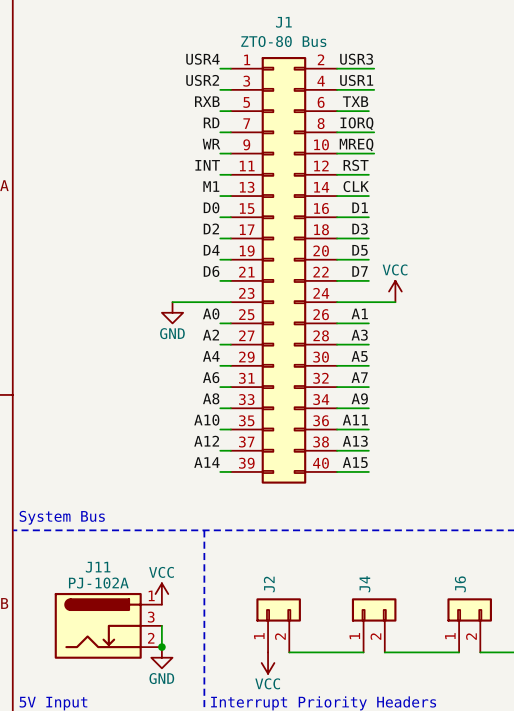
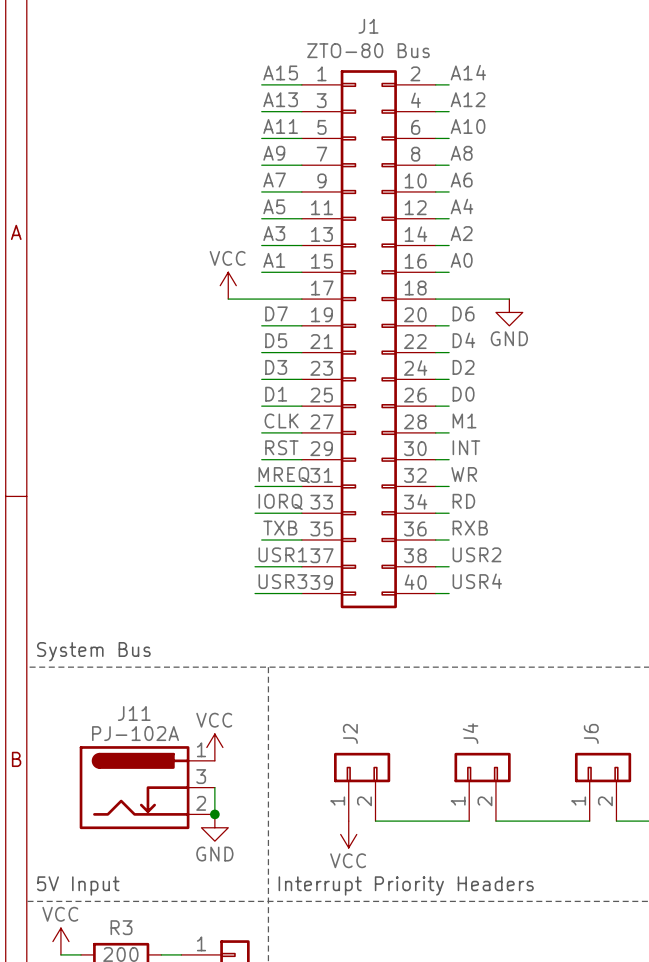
label: USR4 (202, 59) -> none
label: none -> A15 (280, 72)
label: USR3 (356, 59) -> none
label: none -> A14 (468, 72)
wire: (347, 68) (374, 68) -> none
label: USR2 (202, 80) -> none
label: none -> A13 (280, 99)
label: USR1 (356, 80) -> none
label: none -> A12 (468, 99)
wire: (347, 89) (374, 89) -> none
label: RXB (207, 101) -> none
label: none -> A11 (280, 126)
label: TXB (355, 101) -> none
label: none -> A10 (468, 126)
wire: (347, 111) (368, 111) -> (261, 165) (288, 165)
label: none -> A9 (274, 153)
label: RD (211, 122) -> none
label: none -> A8 (461, 153)
label: IORQ (356, 123) -> none
wire: (347, 132) (374, 132) -> none
label: none -> A7 (274, 180)
label: WR (211, 144) -> none
label: MREQ (356, 144) -> none
label: none -> A6 (461, 180)
wire: (347, 153) (374, 153) -> (475, 299) (509, 299)
label: INT (207, 165) -> none
label: none -> A5 (274, 206)
label: RST (356, 165) -> none
label: none -> A4 (461, 206)
wire: (347, 174) (368, 174) -> (261, 84) (288, 84)
label: none -> A3 (274, 233)
label position: M1 (211, 186) -> M1 (464, 420)
label: CLK (356, 186) -> none
wire: none -> (261, 245) (288, 245)
wire: (347, 196) (368, 196) -> (261, 111) (288, 111)
label position: D0 (211, 207) -> D0 (463, 394)
label position: D1 (360, 207) -> D1 (276, 394)
wire: (347, 217) (368, 217) -> (261, 138) (288, 138)
power symbol: none -> VCC (228, 285)
label position: D2 (211, 228) -> D2 (463, 367)
label position: D3 (360, 229) -> D3 (276, 367)
power symbol: none -> GND (509, 312)
label position: D4 (211, 250) -> D4 (463, 340)
label position: D5 (360, 250) -> D5 (276, 340)
wire: (347, 259) (368, 259) -> (261, 191) (288, 191)
label position: D6 (211, 271) -> D6 (463, 313)
label position: D7 (360, 271) -> D7 (276, 313)
wire: (347, 280) (368, 280) -> (261, 218) (288, 218)
power symbol: VCC (395, 291) -> none
wire: (172, 302) (199, 302) -> (255, 486) (288, 486)
wire: (347, 302) (395, 302) -> (228, 299) (288, 299)
power symbol: GND (172, 312) -> none
label position: A0 (211, 313) -> A0 (461, 260)
label position: A1 (359, 313) -> A1 (274, 260)
wire: (347, 323) (368, 323) -> (261, 272) (288, 272)
label position: A2 (211, 335) -> A2 (461, 233)
label: none -> CLK (281, 420)
label: A3 (359, 335) -> none
wire: (347, 344) (368, 344) -> none
label: A4 (211, 356) -> none
label: none -> RST (281, 447)
label: A5 (359, 356) -> none
label: none -> INT (466, 447)
wire: (347, 365) (368, 365) -> (261, 325) (288, 325)
label: A6 (211, 377) -> none
label: none -> WR (464, 474)
label: A7 (359, 377) -> none
label: none -> MREQ (284, 475)
wire: (347, 387) (368, 387) -> (261, 352) (288, 352)
label: A8 (211, 398) -> none
label: none -> RD (463, 501)
label: A9 (359, 398) -> none
label: none -> IORQ (280, 501)
wire: none -> (255, 513) (288, 513)
wire: (347, 408) (368, 408) -> (261, 539) (288, 539)
label: A10 (206, 420) -> none
label: none -> TXB (280, 528)
label: A11 (355, 420) -> none
label: none -> RXB (470, 528)
wire: (347, 429) (368, 429) -> (261, 406) (288, 406)
label: A12 (206, 441) -> none
label: none -> USR1 (282, 554)
label: A13 (355, 441) -> none
label: none -> USR2 (476, 554)
wire: none -> (255, 566) (288, 566)
wire: (347, 450) (368, 450) -> (261, 432) (288, 432)
label: A14 (206, 462) -> none
label: none -> USR3 (282, 581)
label: A15 (355, 462) -> none
label: none -> USR4 (477, 581)
wire: none -> (255, 593) (288, 593)
wire: (347, 471) (368, 471) -> (261, 459) (288, 459)

